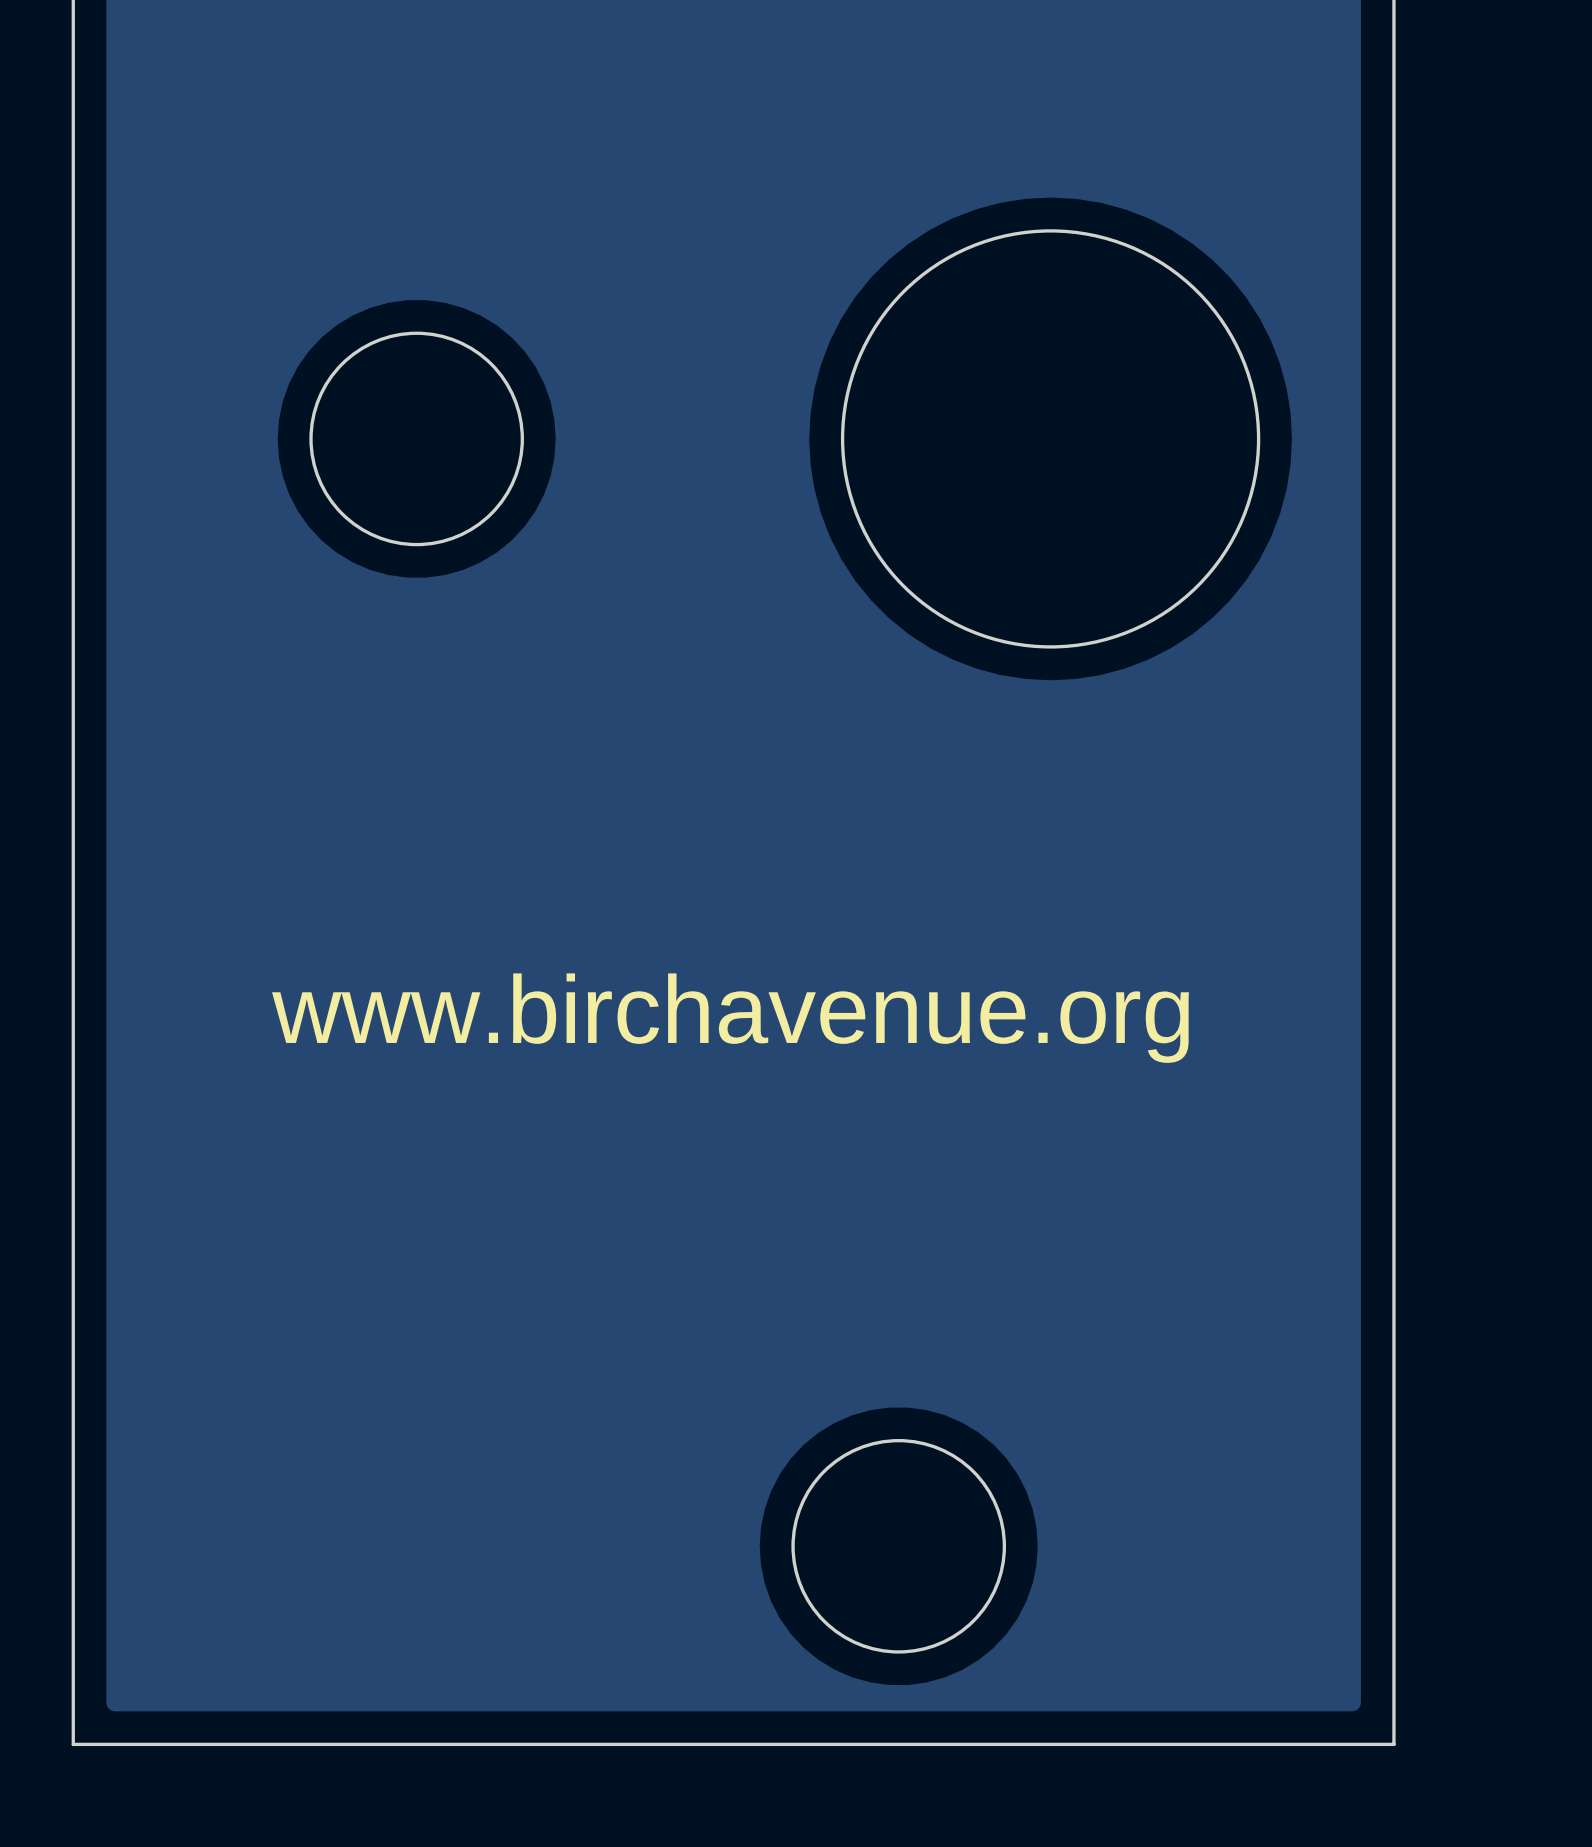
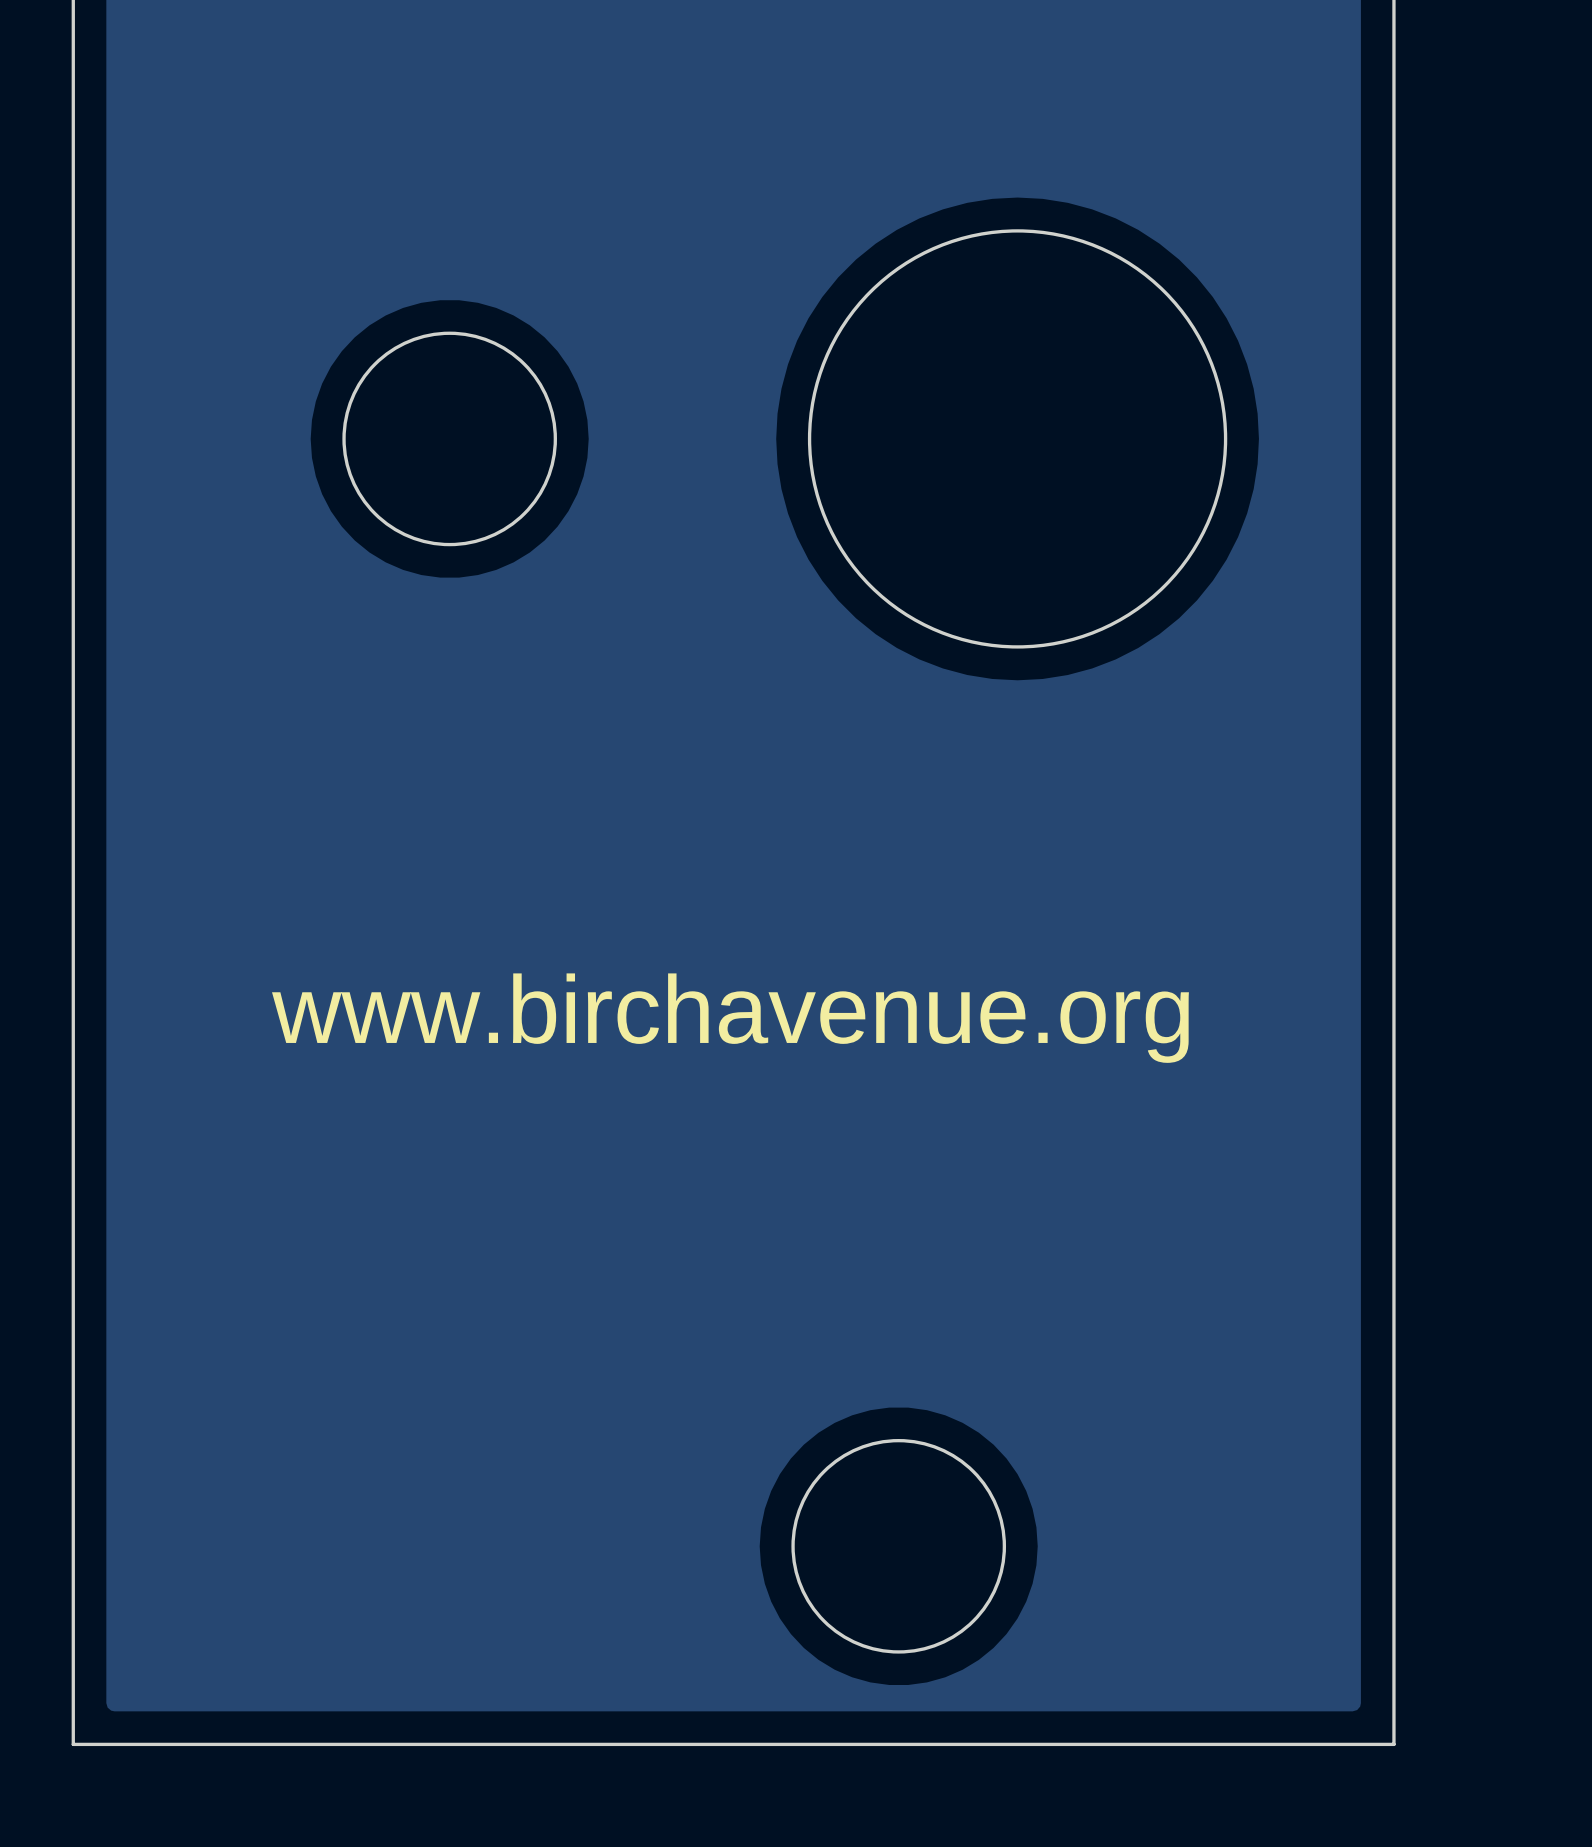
round board edge position: (416, 438) -> (449, 438)
round board edge position: (1050, 438) -> (1017, 438)

